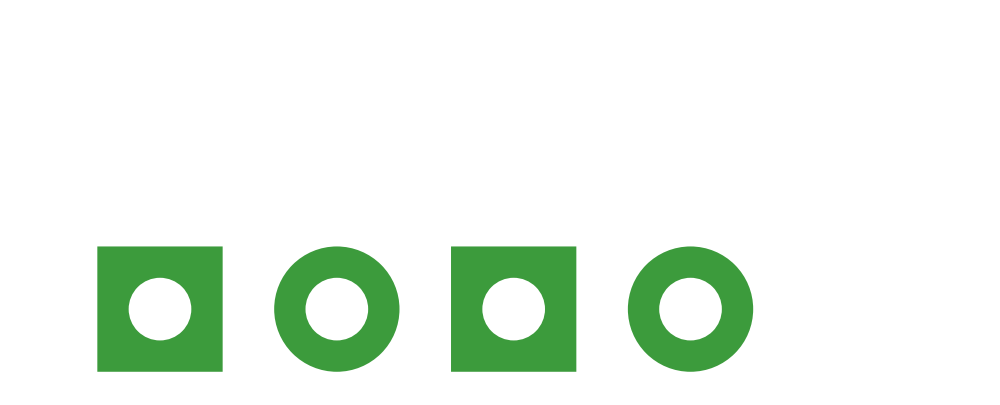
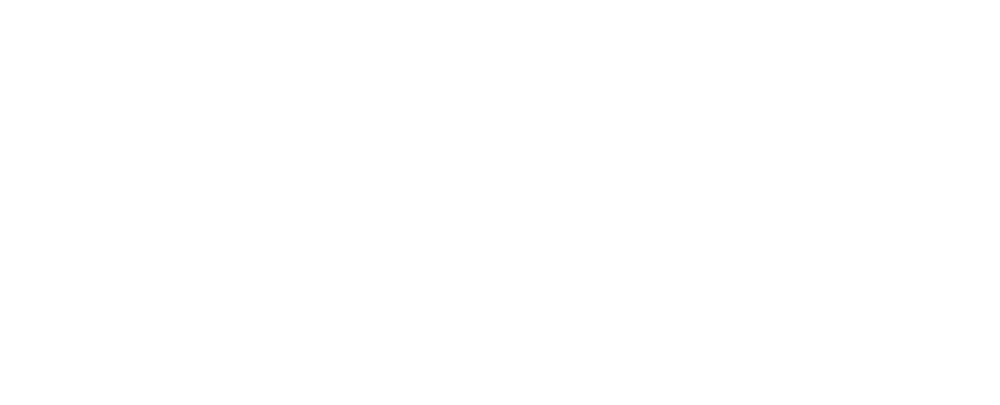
part: (248, 309) -> none
part: (602, 309) -> none

